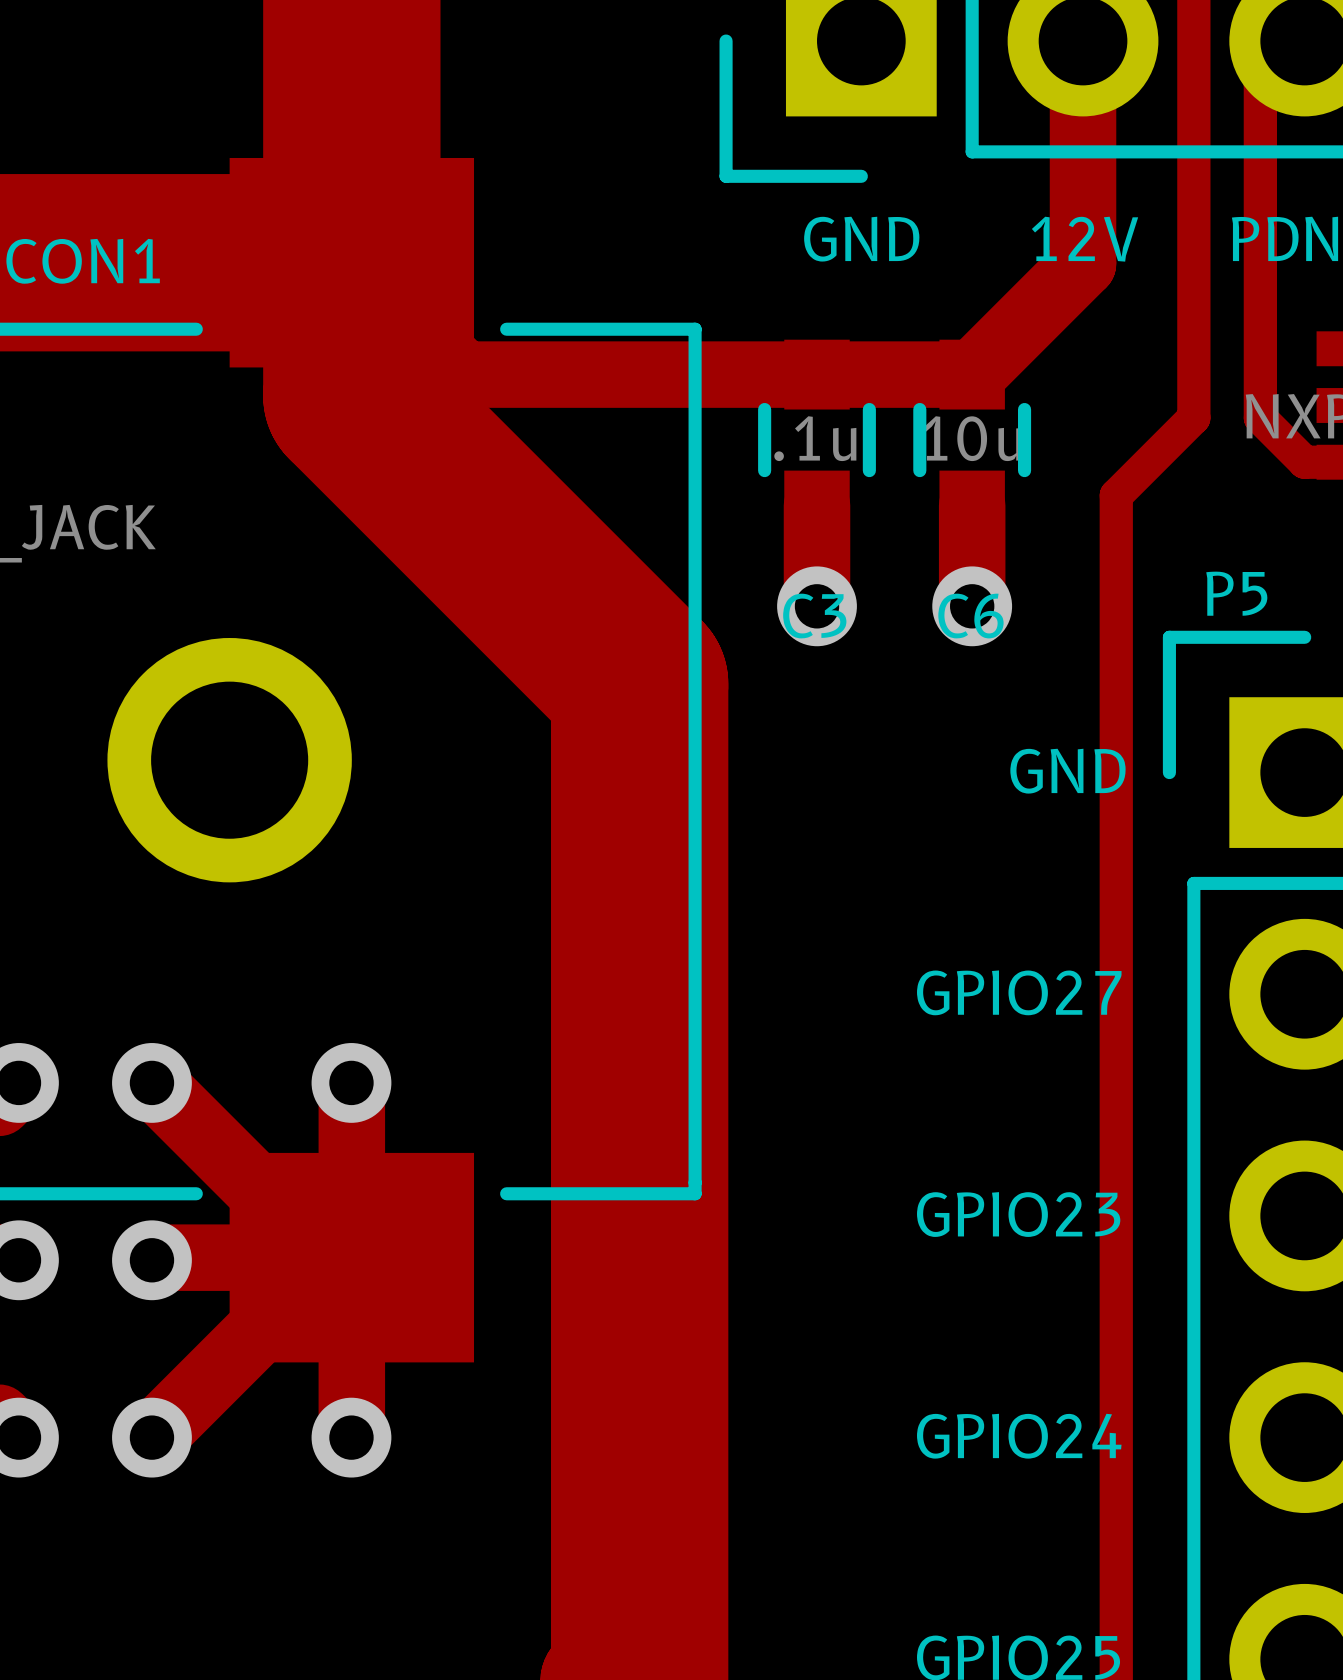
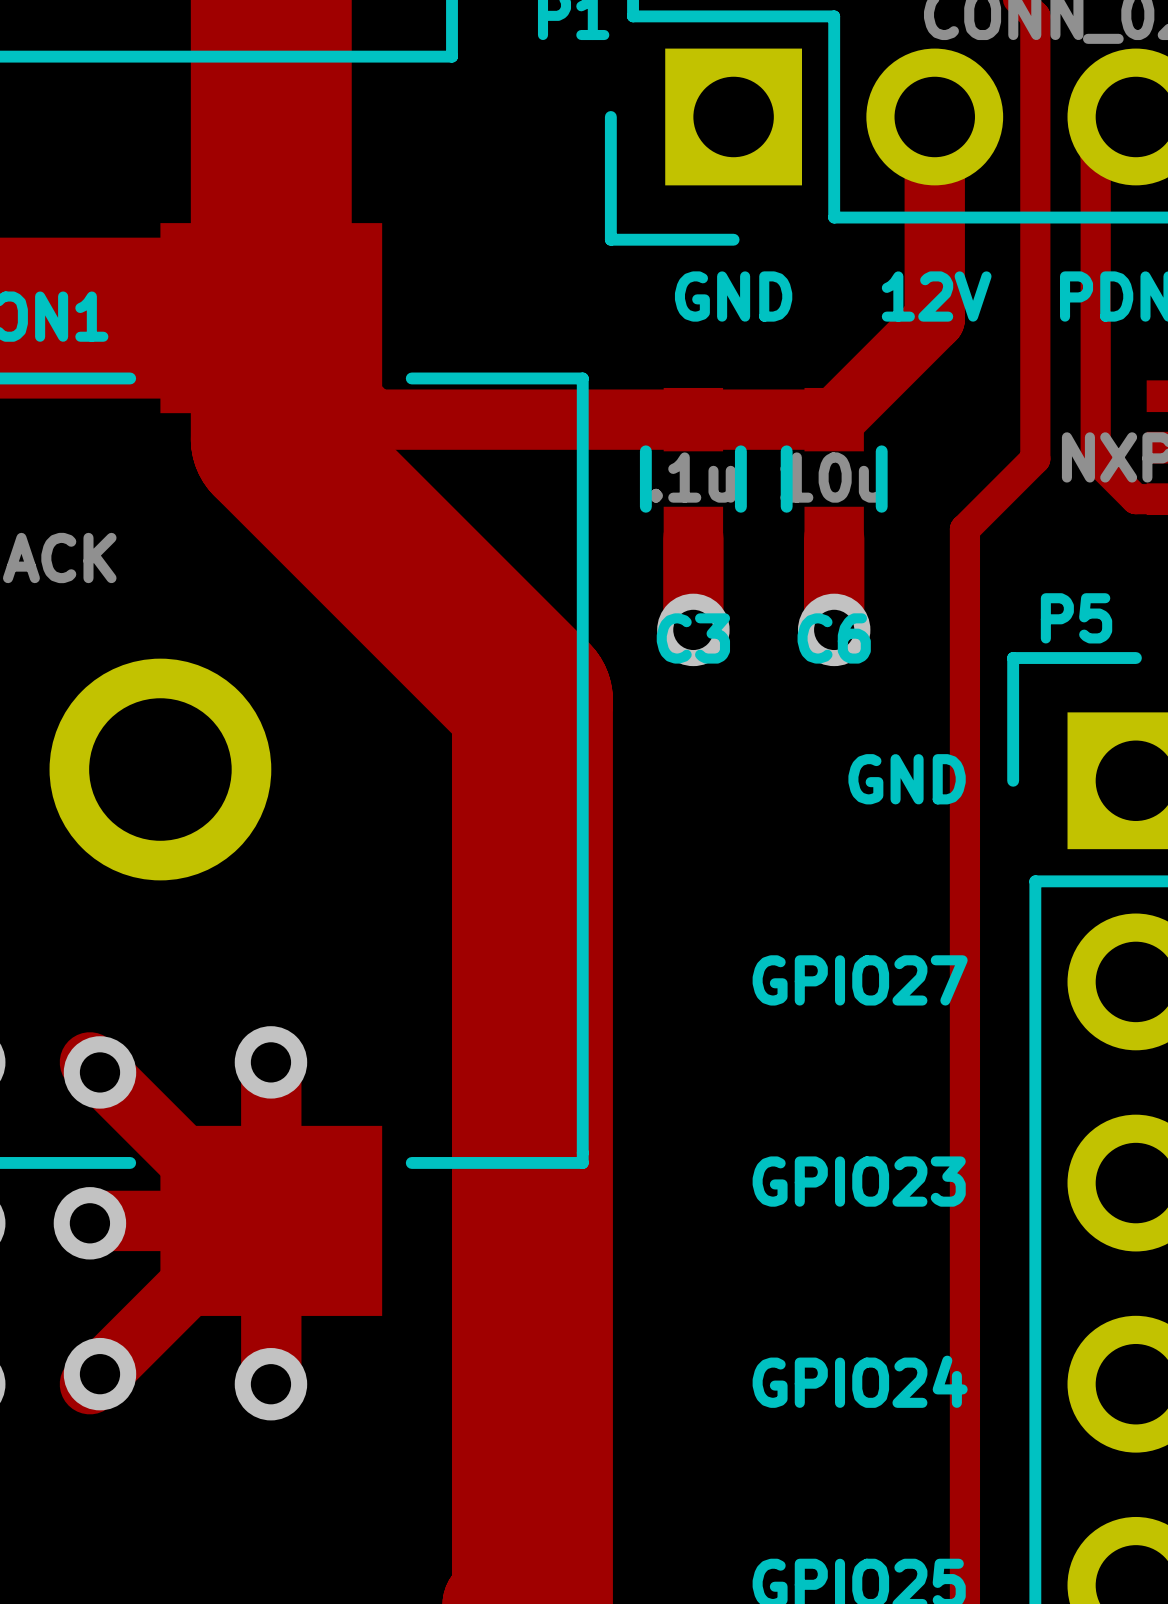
via position: (151, 1082) -> (99, 1072)
via position: (151, 1437) -> (99, 1374)

